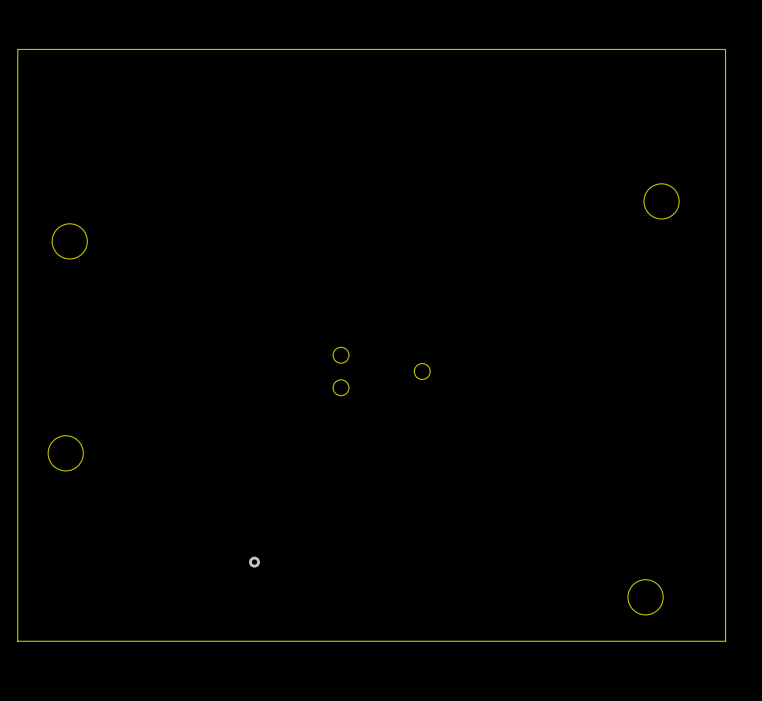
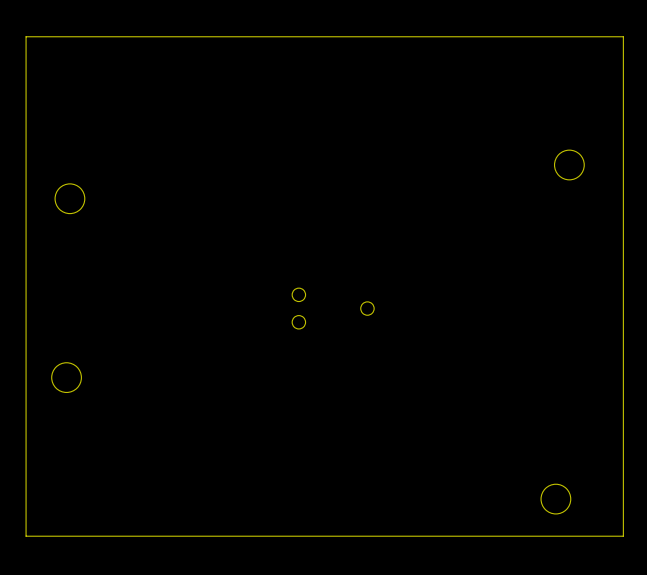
via: (254, 562) -> none

